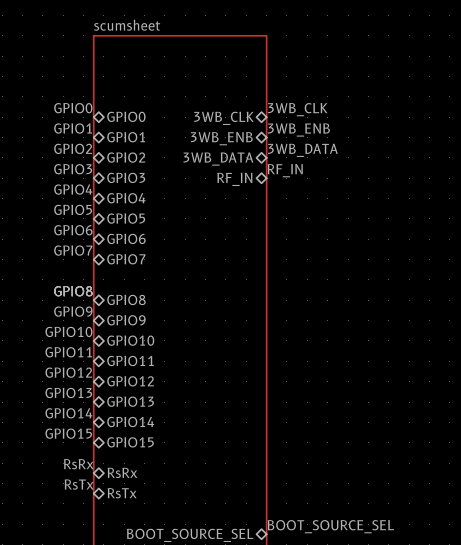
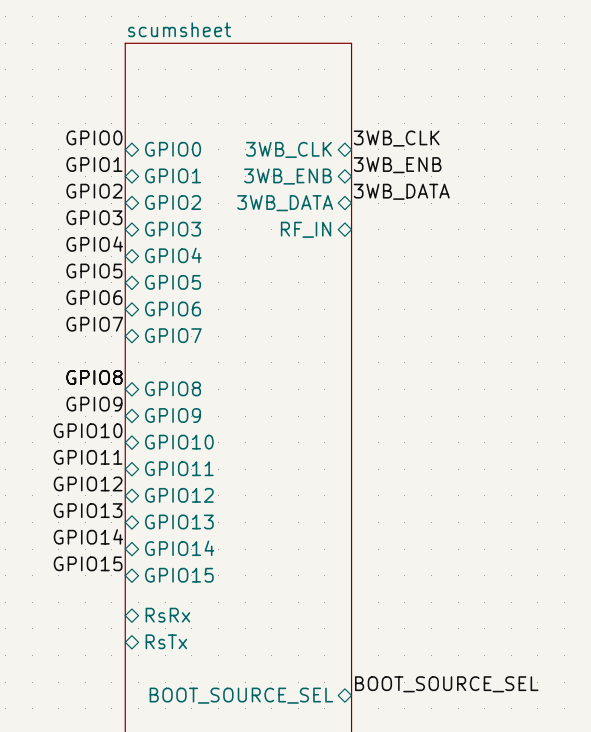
label: RF_IN (285, 170) -> none
label: RsRx (78, 464) -> none
label: RsTx (79, 484) -> none

